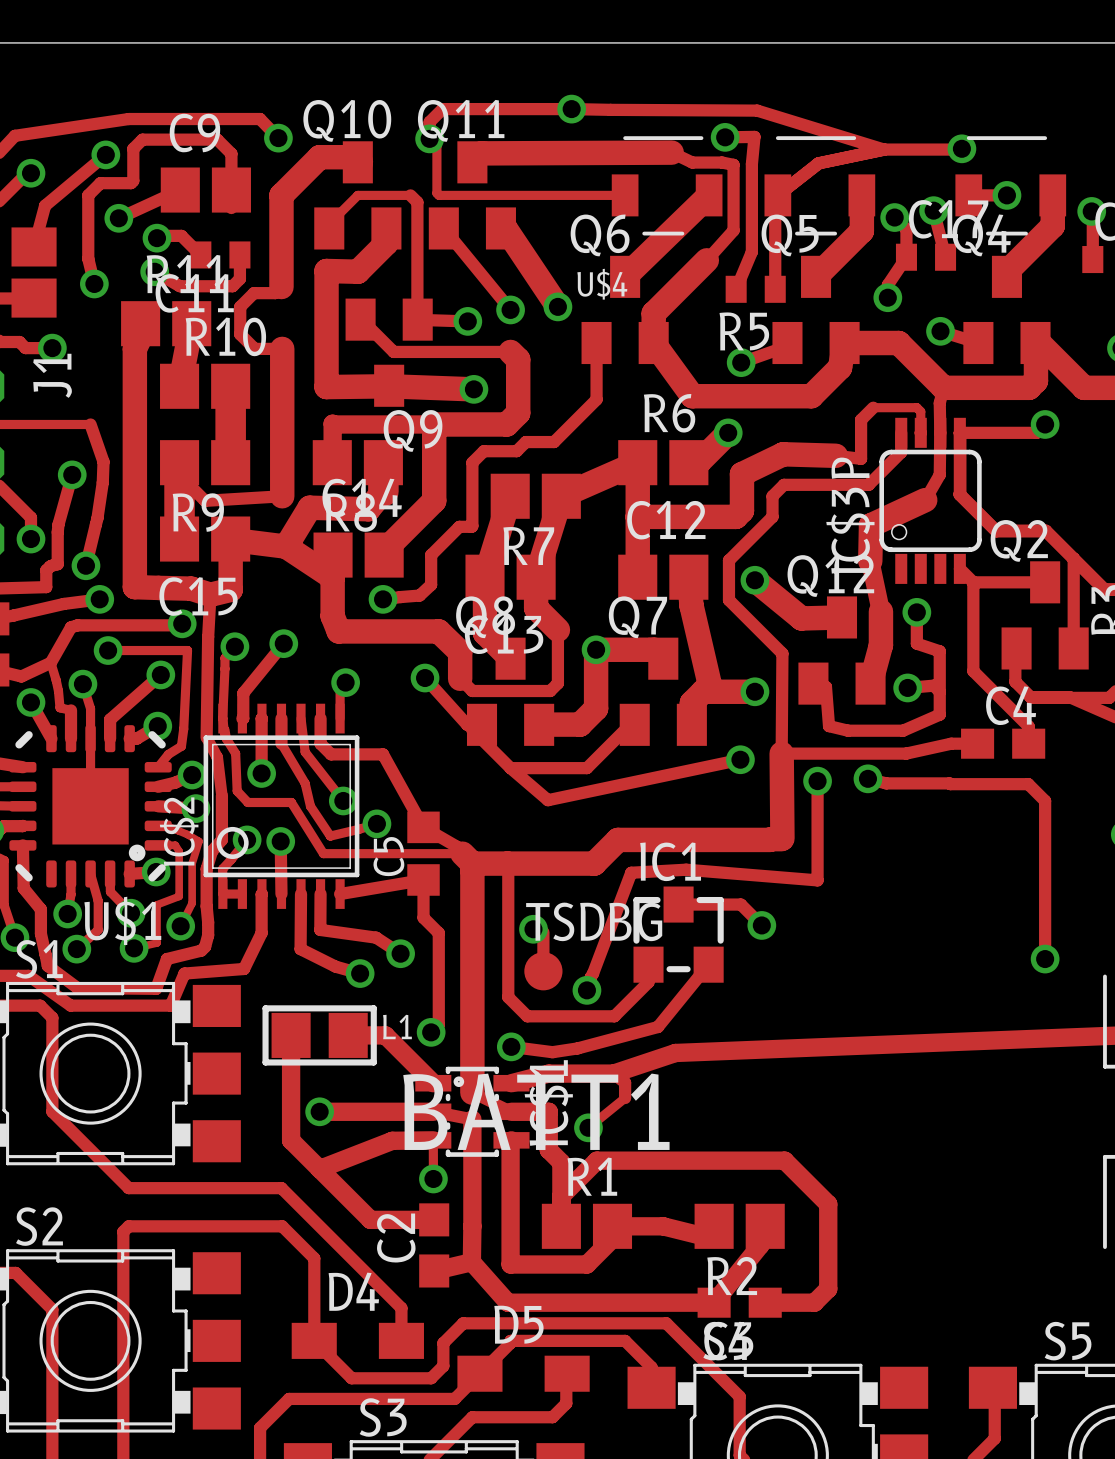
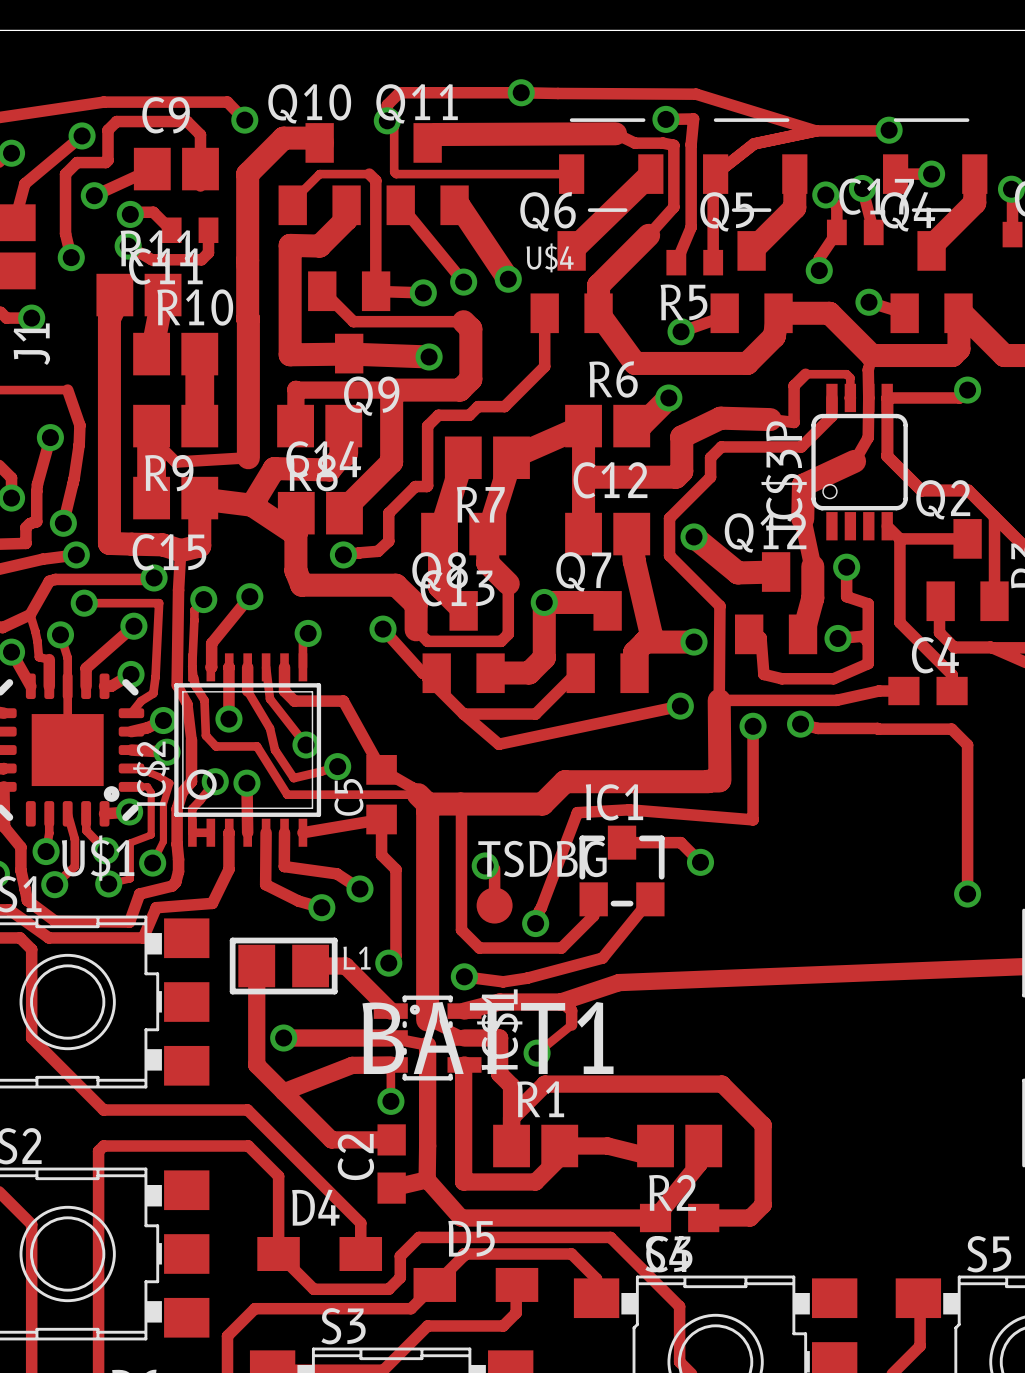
track: (275, 293) (253, 293) (240, 306) (240, 334) (254, 348) (281, 348) -> (247, 260) (248, 318)

